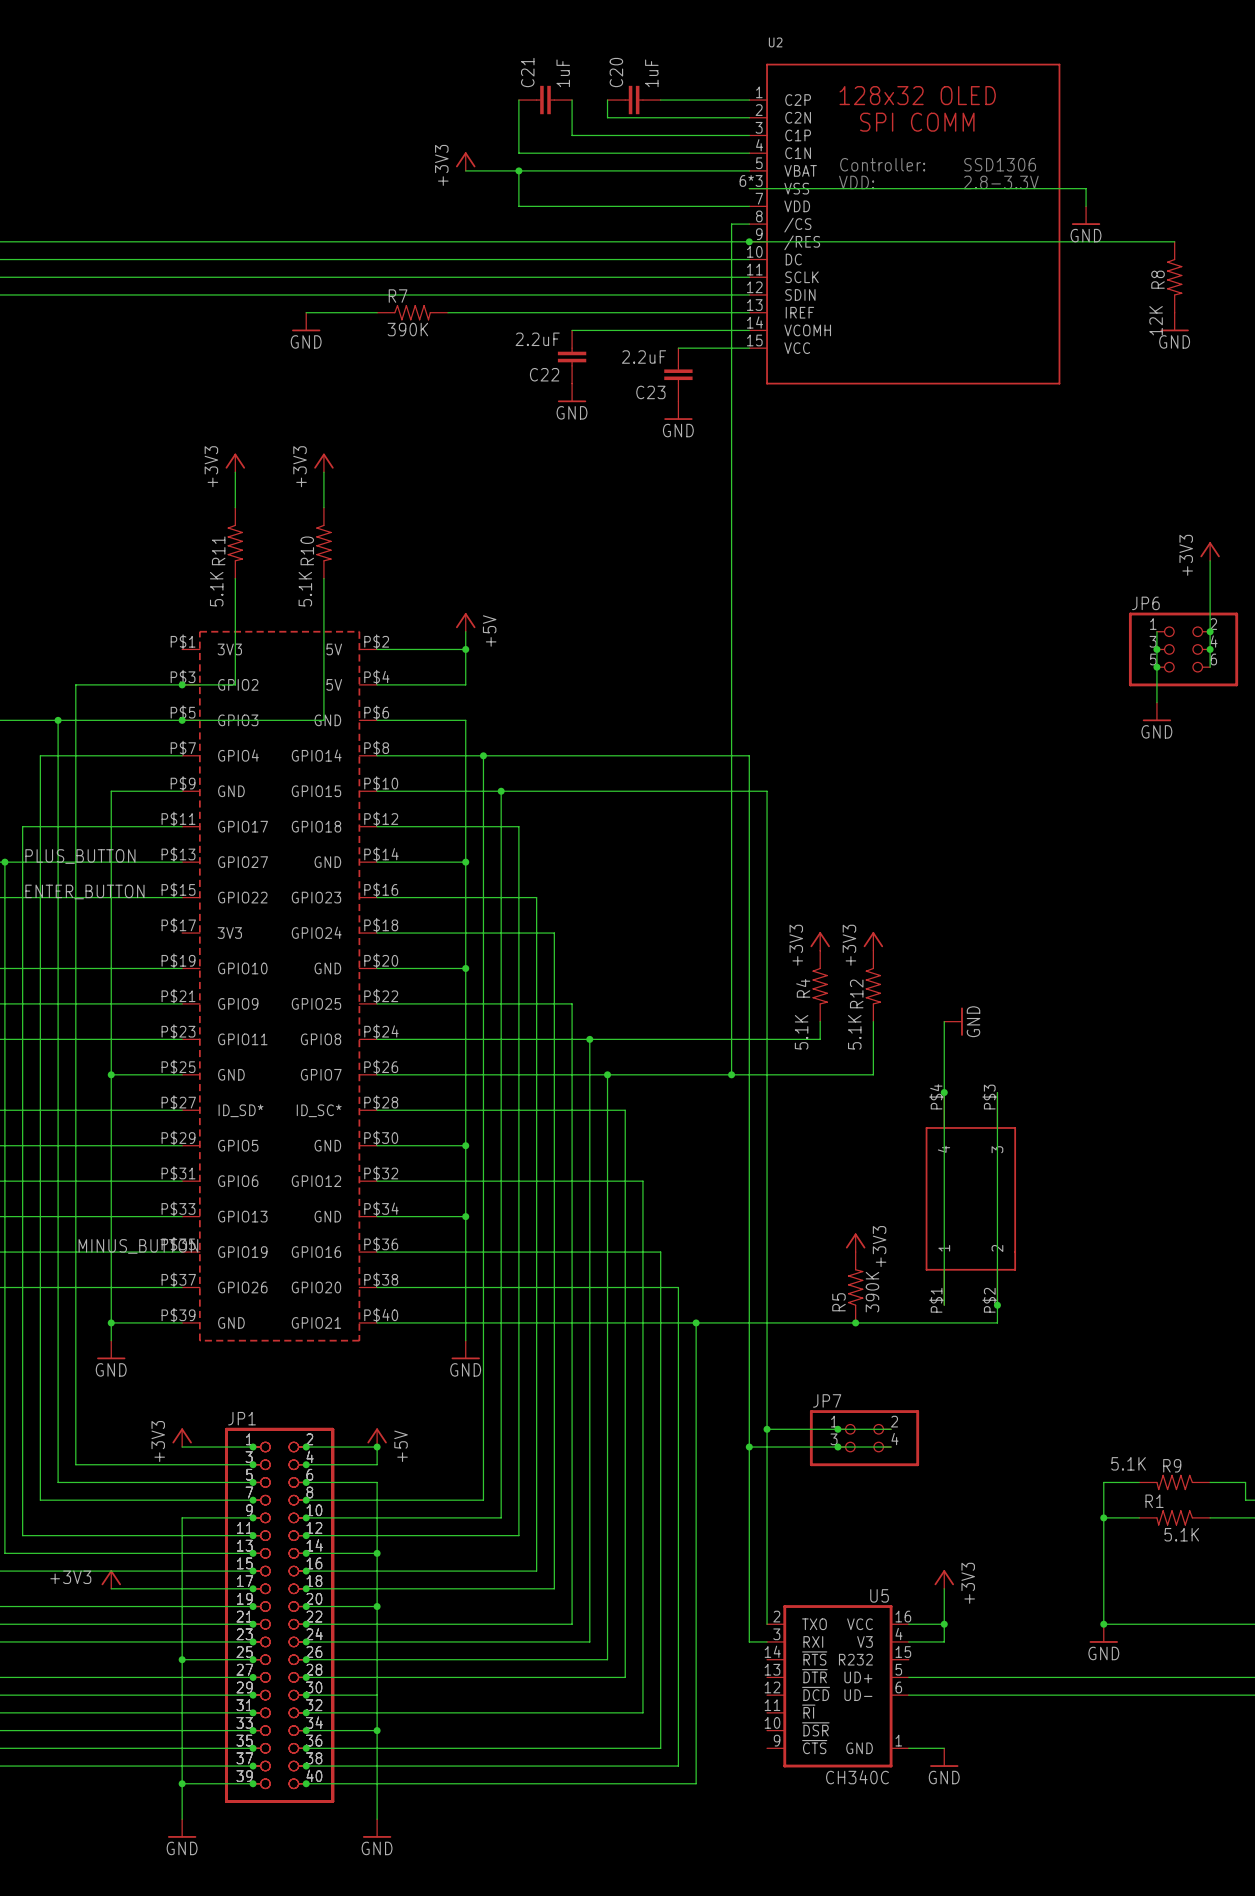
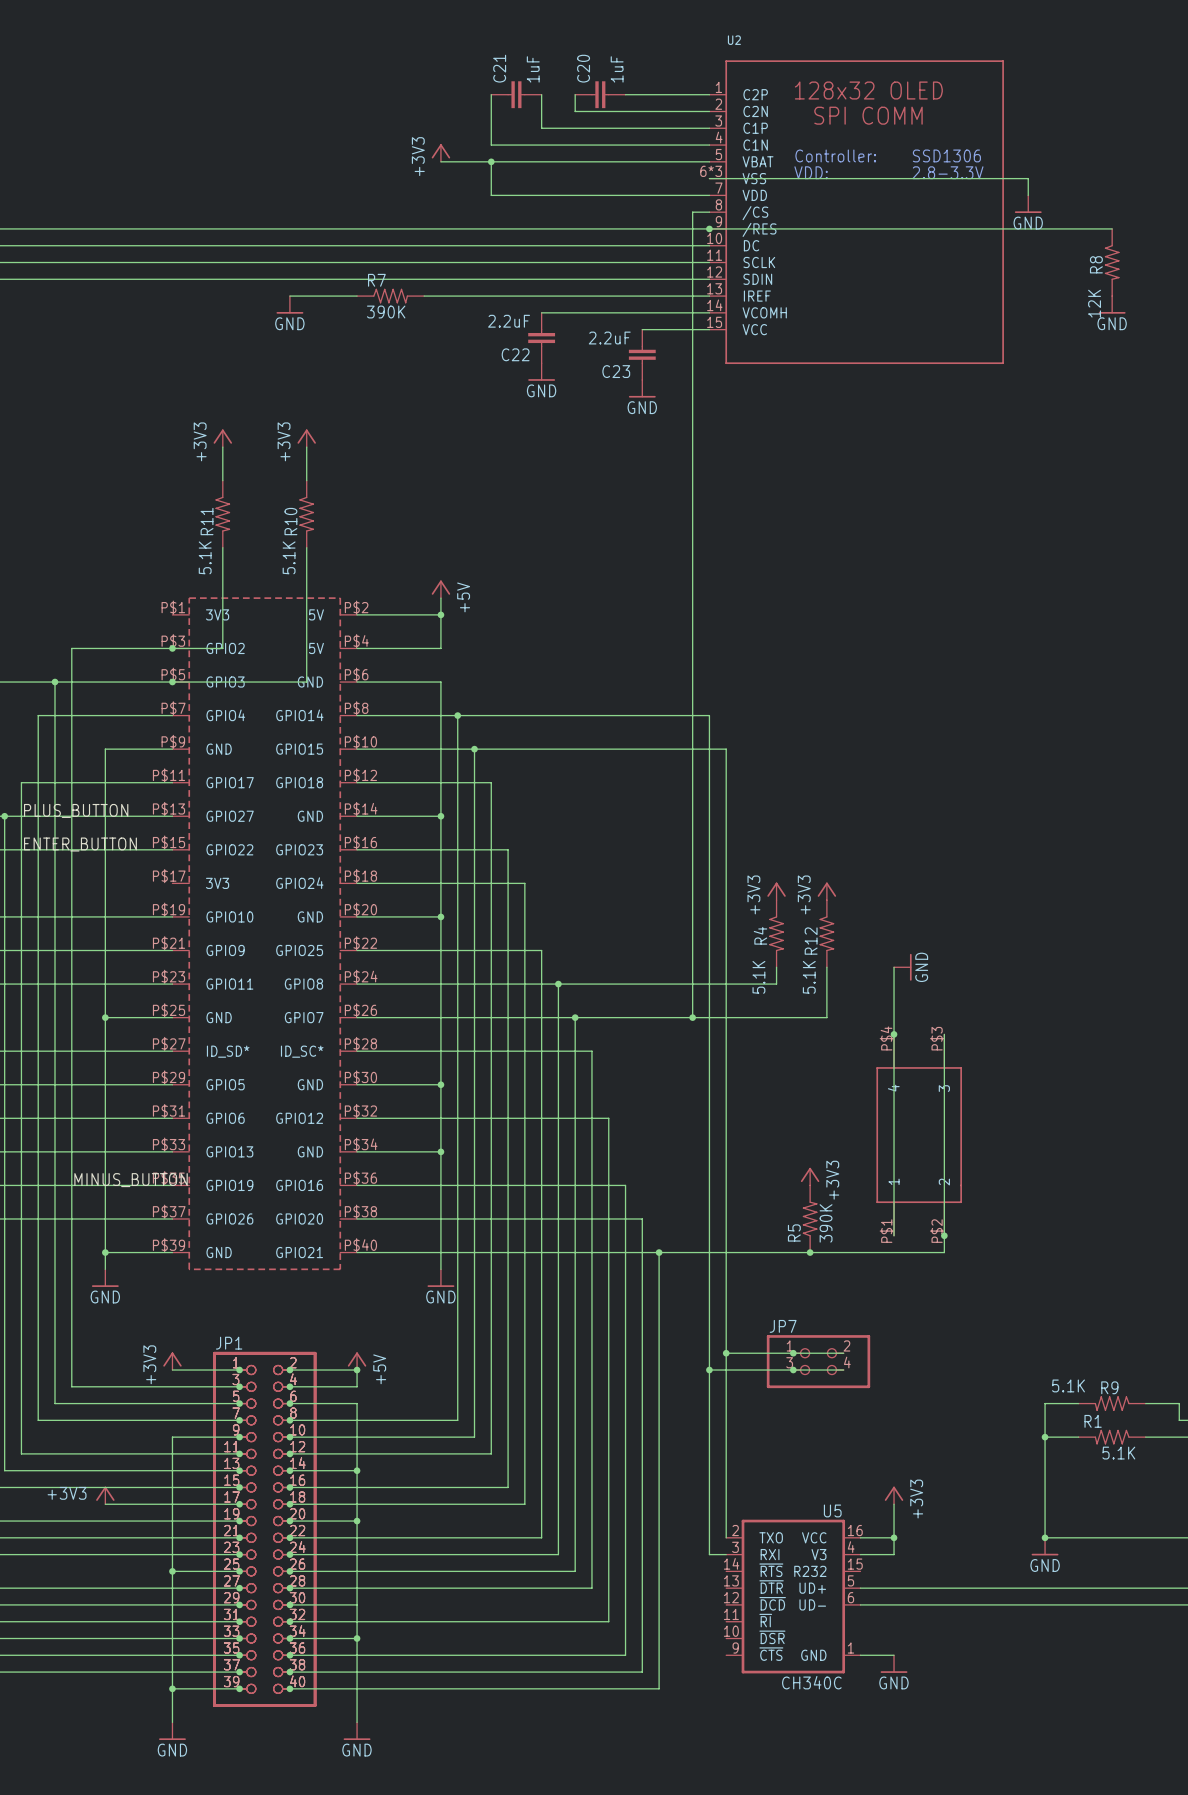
power symbol: +3V3 (1210, 551) -> none
wire: (1210, 560) (1210, 667) -> none
wire: (1156, 631) (1156, 702) -> none
junction: (1210, 631) -> none
junction: (1156, 649) -> none
JP6: (1183, 649) -> none
junction: (1210, 649) -> none
junction: (1156, 667) -> none
power symbol: GND (1156, 711) -> none

